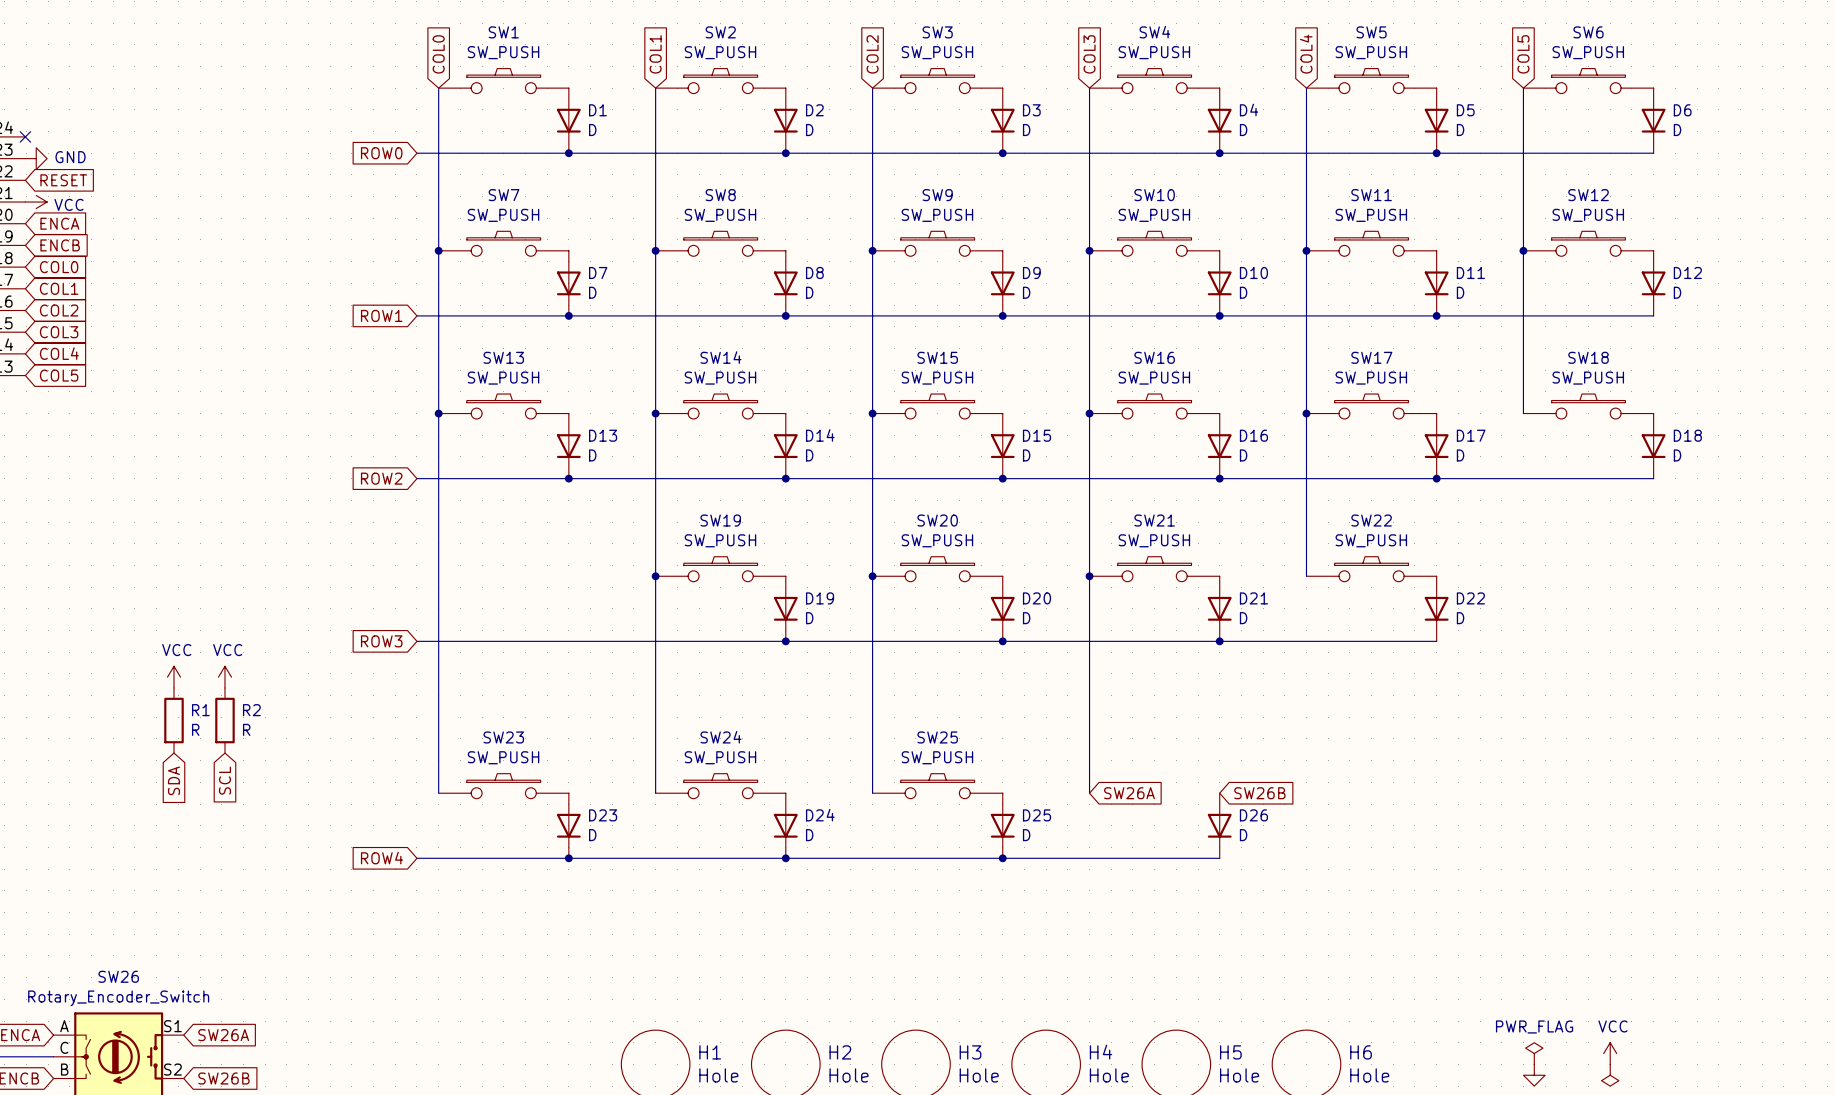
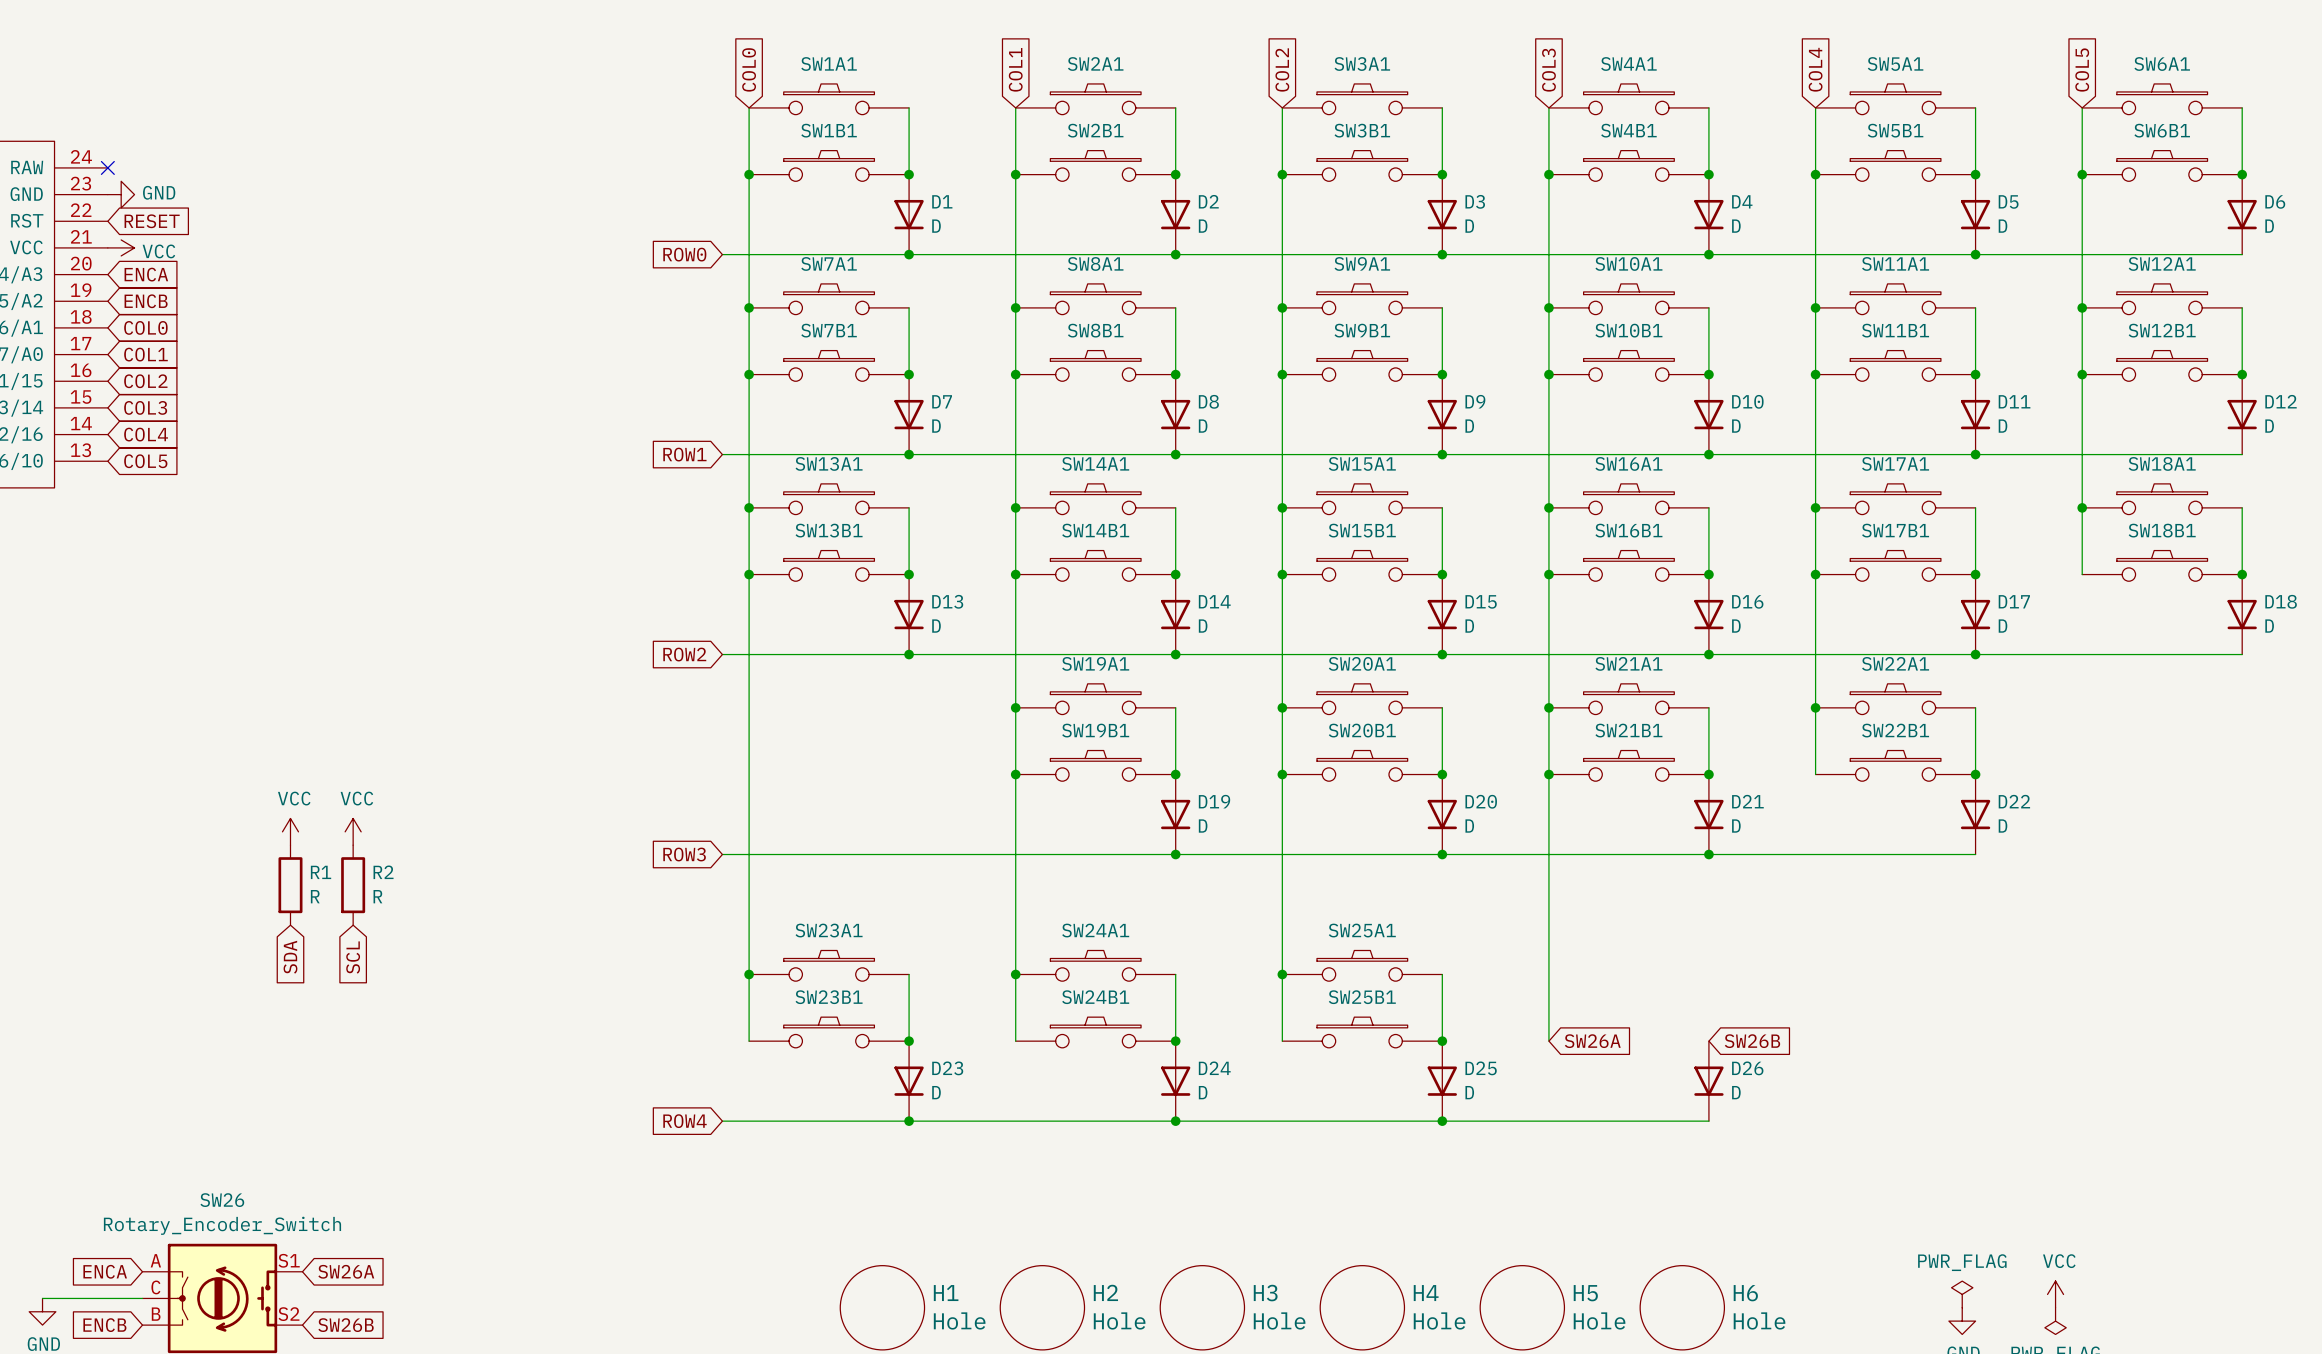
global label position: COL0 (438, 54) -> COL0 (749, 69)
global label position: COL1 (655, 54) -> COL1 (1015, 69)
global label position: COL2 (872, 54) -> COL2 (1282, 69)
global label position: COL3 (1089, 54) -> COL3 (1548, 70)
global label position: COL4 (1306, 54) -> COL4 (1815, 69)
global label position: COL5 (1523, 54) -> COL5 (2082, 70)
SW1: SW_PUSH (503, 81) -> none
SW1A1: none -> (829, 99)
SW2: SW_PUSH (720, 81) -> none
SW2A1: none -> (1095, 99)
SW3: SW_PUSH (937, 81) -> none
SW3A1: none -> (1362, 99)
SW4: SW_PUSH (1154, 81) -> none
SW4A1: none -> (1628, 99)
SW5: SW_PUSH (1371, 81) -> none
SW5A1: none -> (1895, 99)
SW6: SW_PUSH (1588, 81) -> none
SW6A1: none -> (2162, 99)
wire: (438, 88) (438, 793) -> none
wire: none -> (749, 107) (749, 1041)
wire: (655, 88) (655, 793) -> none
wire: none -> (909, 107) (909, 174)
wire: none -> (1015, 107) (1015, 1041)
wire: (872, 88) (872, 793) -> none
wire: none -> (1175, 107) (1175, 174)
wire: none -> (1282, 107) (1282, 1041)
wire: (1089, 88) (1089, 793) -> none
wire: none -> (1442, 107) (1442, 174)
wire: none -> (1548, 107) (1548, 1041)
wire: (1306, 88) (1306, 576) -> none
wire: none -> (1708, 107) (1708, 174)
wire: none -> (1815, 107) (1815, 774)
wire: (1523, 88) (1523, 413) -> none
wire: none -> (1975, 107) (1975, 174)
wire: none -> (2082, 107) (2082, 574)
wire: none -> (2242, 107) (2242, 174)
D1 position: (568, 120) -> (909, 214)
D2 position: (785, 120) -> (1175, 214)
D3 position: (1002, 120) -> (1442, 214)
D4 position: (1219, 120) -> (1708, 214)
D5 position: (1436, 120) -> (1975, 214)
D6 position: (1653, 120) -> (2242, 214)
SW1B1: none -> (829, 165)
SW2B1: none -> (1095, 165)
SW3B1: none -> (1362, 165)
SW4B1: none -> (1628, 165)
SW5B1: none -> (1895, 165)
SW6B1: none -> (2162, 165)
junction: none -> (909, 174)
junction: none -> (1175, 174)
junction: none -> (1442, 174)
junction: none -> (1708, 174)
junction: none -> (1975, 174)
junction: none -> (2082, 174)
junction: none -> (2242, 174)
global label position: ROW0 (381, 153) -> ROW0 (684, 254)
wire: (416, 153) (1653, 153) -> (722, 254) (2242, 254)
junction position: (568, 153) -> (749, 174)
junction position: (785, 153) -> (1015, 174)
junction position: (1002, 153) -> (1282, 174)
junction position: (1219, 153) -> (1548, 174)
junction position: (1436, 153) -> (1815, 174)
junction: none -> (909, 254)
junction: none -> (1175, 254)
junction: none -> (1442, 254)
junction: none -> (1708, 254)
junction: none -> (1975, 254)
SW7: SW_PUSH (503, 243) -> none
SW7A1: none -> (829, 299)
SW8: SW_PUSH (720, 243) -> none
SW8A1: none -> (1095, 299)
SW9: SW_PUSH (937, 243) -> none
SW9A1: none -> (1362, 299)
SW10: SW_PUSH (1154, 243) -> none
SW10A1: none -> (1628, 299)
SW11: SW_PUSH (1371, 243) -> none
SW11A1: none -> (1895, 299)
SW12: SW_PUSH (1588, 243) -> none
SW12A1: none -> (2162, 299)
junction: (438, 250) -> none
junction: none -> (749, 307)
junction: (655, 250) -> none
wire: none -> (909, 307) (909, 374)
junction: none -> (1015, 307)
junction: (872, 250) -> none
wire: none -> (1175, 307) (1175, 374)
junction: none -> (1282, 307)
junction: (1089, 250) -> none
wire: none -> (1442, 307) (1442, 374)
junction: none -> (1548, 307)
junction: (1306, 250) -> none
wire: none -> (1708, 307) (1708, 374)
junction: none -> (1815, 307)
junction: (1523, 250) -> none
wire: none -> (1975, 307) (1975, 374)
junction: none -> (2082, 307)
wire: none -> (2242, 307) (2242, 374)
D7 position: (568, 283) -> (909, 414)
D8 position: (785, 283) -> (1175, 414)
D9 position: (1002, 283) -> (1442, 414)
D10 position: (1219, 283) -> (1708, 414)
D11 position: (1436, 283) -> (1975, 414)
D12 position: (1653, 283) -> (2242, 414)
SW7B1: none -> (829, 365)
SW8B1: none -> (1095, 365)
SW9B1: none -> (1362, 365)
SW10B1: none -> (1628, 365)
SW11B1: none -> (1895, 365)
SW12B1: none -> (2162, 365)
junction: none -> (909, 374)
junction: none -> (1175, 374)
junction: none -> (1442, 374)
junction: none -> (1708, 374)
junction: none -> (1975, 374)
junction: none -> (2082, 374)
junction: none -> (2242, 374)
global label position: ROW1 (381, 315) -> ROW1 (684, 454)
wire: (416, 315) (1653, 315) -> (722, 454) (2242, 454)
junction position: (568, 315) -> (749, 374)
junction position: (785, 315) -> (1015, 374)
junction position: (1002, 315) -> (1282, 374)
junction position: (1219, 315) -> (1548, 374)
junction position: (1436, 315) -> (1815, 374)
junction: none -> (909, 454)
junction: none -> (1175, 454)
junction: none -> (1442, 454)
junction: none -> (1708, 454)
junction: none -> (1975, 454)
SW13: SW_PUSH (503, 406) -> none
SW13A1: none -> (829, 499)
SW14: SW_PUSH (720, 406) -> none
SW14A1: none -> (1095, 499)
SW15: SW_PUSH (937, 406) -> none
SW15A1: none -> (1362, 499)
SW16: SW_PUSH (1154, 406) -> none
SW16A1: none -> (1628, 499)
SW17: SW_PUSH (1371, 406) -> none
SW17A1: none -> (1895, 499)
SW18: SW_PUSH (1588, 406) -> none
SW18A1: none -> (2162, 499)
junction: (438, 413) -> none
junction: none -> (749, 507)
junction: (655, 413) -> none
wire: none -> (909, 507) (909, 574)
junction: none -> (1015, 507)
junction: (872, 413) -> none
wire: none -> (1175, 507) (1175, 574)
junction: none -> (1282, 507)
junction: (1089, 413) -> none
wire: none -> (1442, 507) (1442, 574)
junction: none -> (1548, 507)
junction: (1306, 413) -> none
wire: none -> (1708, 507) (1708, 574)
junction: none -> (1815, 507)
wire: none -> (1975, 507) (1975, 574)
junction: none -> (2082, 507)
wire: none -> (2242, 507) (2242, 574)
D13 position: (568, 446) -> (909, 614)
D14 position: (785, 446) -> (1175, 614)
D15 position: (1002, 446) -> (1442, 614)
D16 position: (1219, 446) -> (1708, 614)
D17 position: (1436, 446) -> (1975, 614)
D18 position: (1653, 446) -> (2242, 614)
SW13B1: none -> (829, 565)
SW14B1: none -> (1095, 565)
SW15B1: none -> (1362, 565)
SW16B1: none -> (1628, 565)
SW17B1: none -> (1895, 565)
SW18B1: none -> (2162, 565)
junction: none -> (909, 574)
junction: none -> (1175, 574)
junction: none -> (1442, 574)
junction: none -> (1708, 574)
junction: none -> (1975, 574)
junction: none -> (2242, 574)
global label position: ROW2 (381, 478) -> ROW2 (684, 654)
wire: (416, 478) (1653, 478) -> (722, 654) (2242, 654)
junction position: (568, 478) -> (749, 574)
junction position: (785, 478) -> (1015, 574)
junction position: (1002, 478) -> (1282, 574)
junction position: (1219, 478) -> (1548, 574)
junction position: (1436, 478) -> (1815, 574)
junction: none -> (1175, 654)
junction: none -> (1442, 654)
junction: none -> (1708, 654)
junction: none -> (1975, 654)
SW19: SW_PUSH (720, 569) -> none
SW19A1: none -> (1095, 699)
SW20: SW_PUSH (937, 569) -> none
SW20A1: none -> (1362, 699)
SW21: SW_PUSH (1154, 569) -> none
SW21A1: none -> (1628, 699)
SW22: SW_PUSH (1371, 569) -> none
SW22A1: none -> (1895, 699)
junction position: (655, 576) -> (909, 654)
junction: none -> (1015, 707)
junction: (872, 576) -> none
wire: none -> (1175, 707) (1175, 774)
junction: none -> (1282, 707)
junction: (1089, 576) -> none
wire: none -> (1442, 707) (1442, 774)
junction: none -> (1548, 707)
wire: none -> (1708, 707) (1708, 774)
junction: none -> (1815, 707)
wire: none -> (1975, 707) (1975, 774)
D19 position: (785, 608) -> (1175, 814)
D20 position: (1002, 608) -> (1442, 814)
D21 position: (1219, 608) -> (1708, 814)
D22 position: (1436, 608) -> (1975, 814)
SW19B1: none -> (1095, 765)
SW20B1: none -> (1362, 765)
SW21B1: none -> (1628, 765)
SW22B1: none -> (1895, 765)
junction: none -> (1175, 774)
junction: none -> (1442, 774)
junction: none -> (1708, 774)
junction: none -> (1975, 774)
global label position: ROW3 (381, 641) -> ROW3 (684, 854)
wire: (416, 641) (1436, 641) -> (722, 854) (1975, 854)
junction position: (785, 641) -> (1015, 774)
junction position: (1002, 641) -> (1282, 774)
junction position: (1219, 641) -> (1548, 774)
junction: none -> (1175, 854)
junction: none -> (1442, 854)
junction: none -> (1708, 854)
SW23: SW_PUSH (503, 786) -> none
SW23A1: none -> (829, 965)
SW24: SW_PUSH (720, 786) -> none
SW24A1: none -> (1095, 965)
SW25: SW_PUSH (937, 786) -> none
SW25A1: none -> (1362, 965)
junction: none -> (749, 974)
wire: none -> (909, 974) (909, 1041)
junction: none -> (1015, 974)
wire: none -> (1175, 974) (1175, 1041)
junction: none -> (1282, 974)
wire: none -> (1442, 974) (1442, 1041)
global label position: SW26A (1129, 793) -> SW26A (1592, 1041)
global label position: SW26B (1259, 793) -> SW26B (1752, 1041)
D23 position: (568, 825) -> (909, 1081)
D24 position: (785, 825) -> (1175, 1081)
D25 position: (1002, 825) -> (1442, 1081)
D26 position: (1219, 825) -> (1708, 1081)
SW23B1: none -> (829, 1032)
SW24B1: none -> (1095, 1032)
SW25B1: none -> (1362, 1032)
junction: none -> (909, 1041)
junction: none -> (1175, 1041)
junction: none -> (1442, 1041)
global label position: ROW4 (381, 858) -> ROW4 (685, 1121)
wire: (416, 858) (1219, 858) -> (722, 1121) (1708, 1121)
junction: (568, 858) -> none
junction: (785, 858) -> none
junction: (1002, 858) -> none
junction: none -> (909, 1121)
junction: none -> (1175, 1121)
junction: none -> (1442, 1121)

